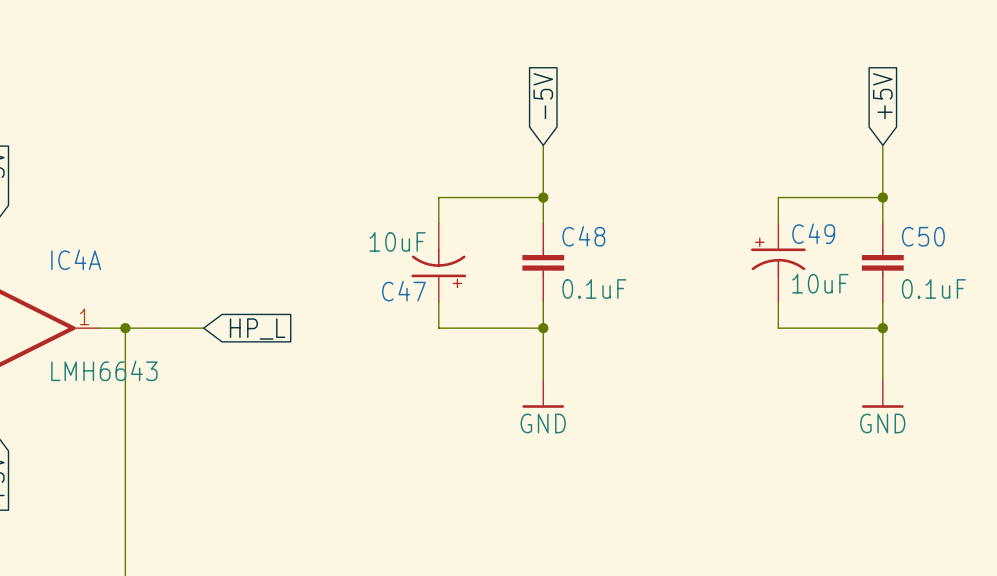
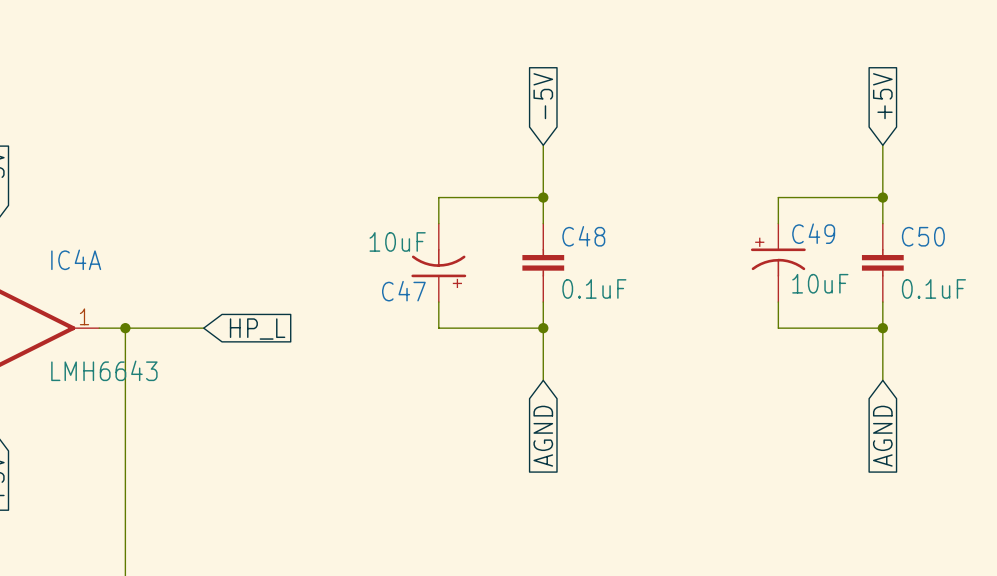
power symbol: GND (543, 394) -> none
power symbol: GND (882, 394) -> none
global label: none -> AGND (543, 436)
global label: none -> AGND (882, 436)

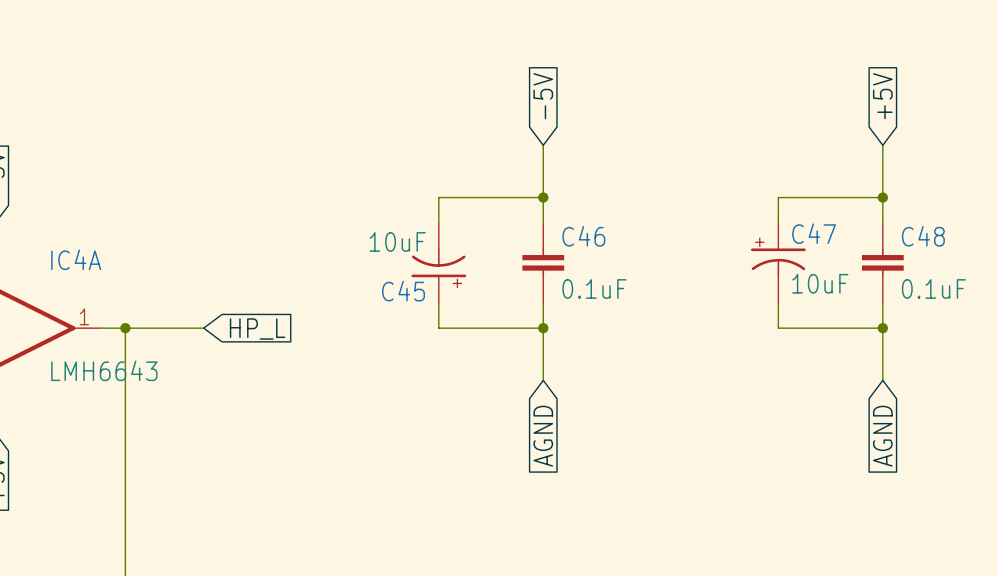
C49 name: C49 (813, 233) -> C47 (814, 233)
C48 name: C48 (583, 236) -> C46 (583, 236)
C50 name: C50 (923, 236) -> C48 (923, 236)
C47 name: C47 (403, 291) -> C45 (403, 291)

